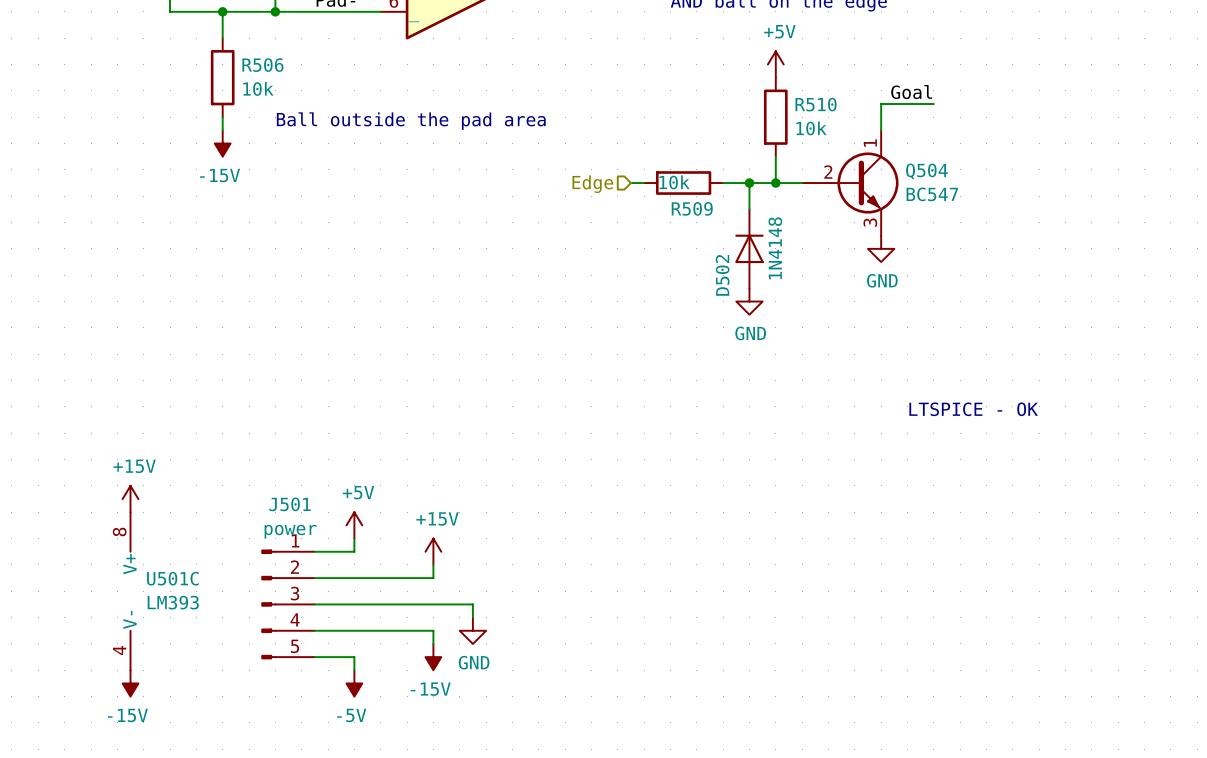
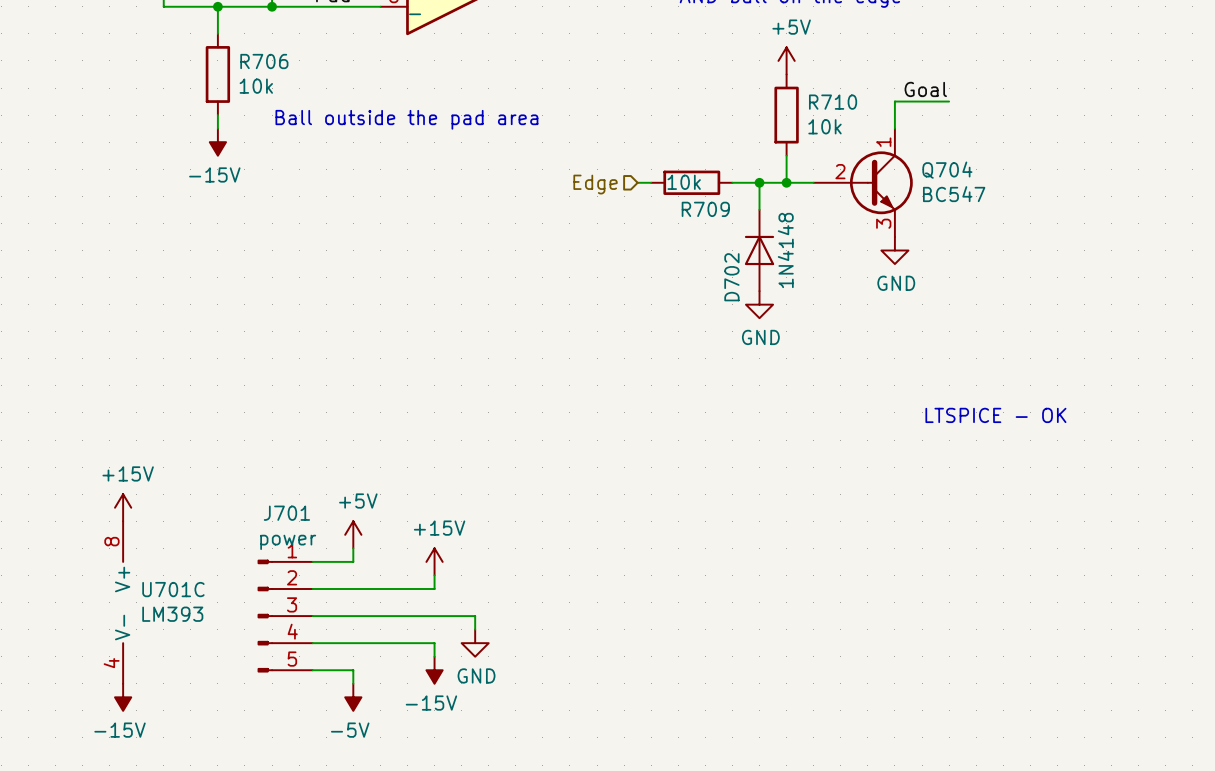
R506 name: R506 (262, 65) -> R706 (264, 61)
R510 name: R510 (816, 104) -> R710 (833, 102)
Q504 name: Q504 (926, 171) -> Q704 (947, 170)
R509 name: R509 (692, 208) -> R709 (705, 209)
D502 name: D502 (722, 275) -> D702 (731, 277)
J501 name: J501 (289, 504) -> J701 (286, 513)
U501C name: U501C (172, 578) -> U701C (173, 589)

